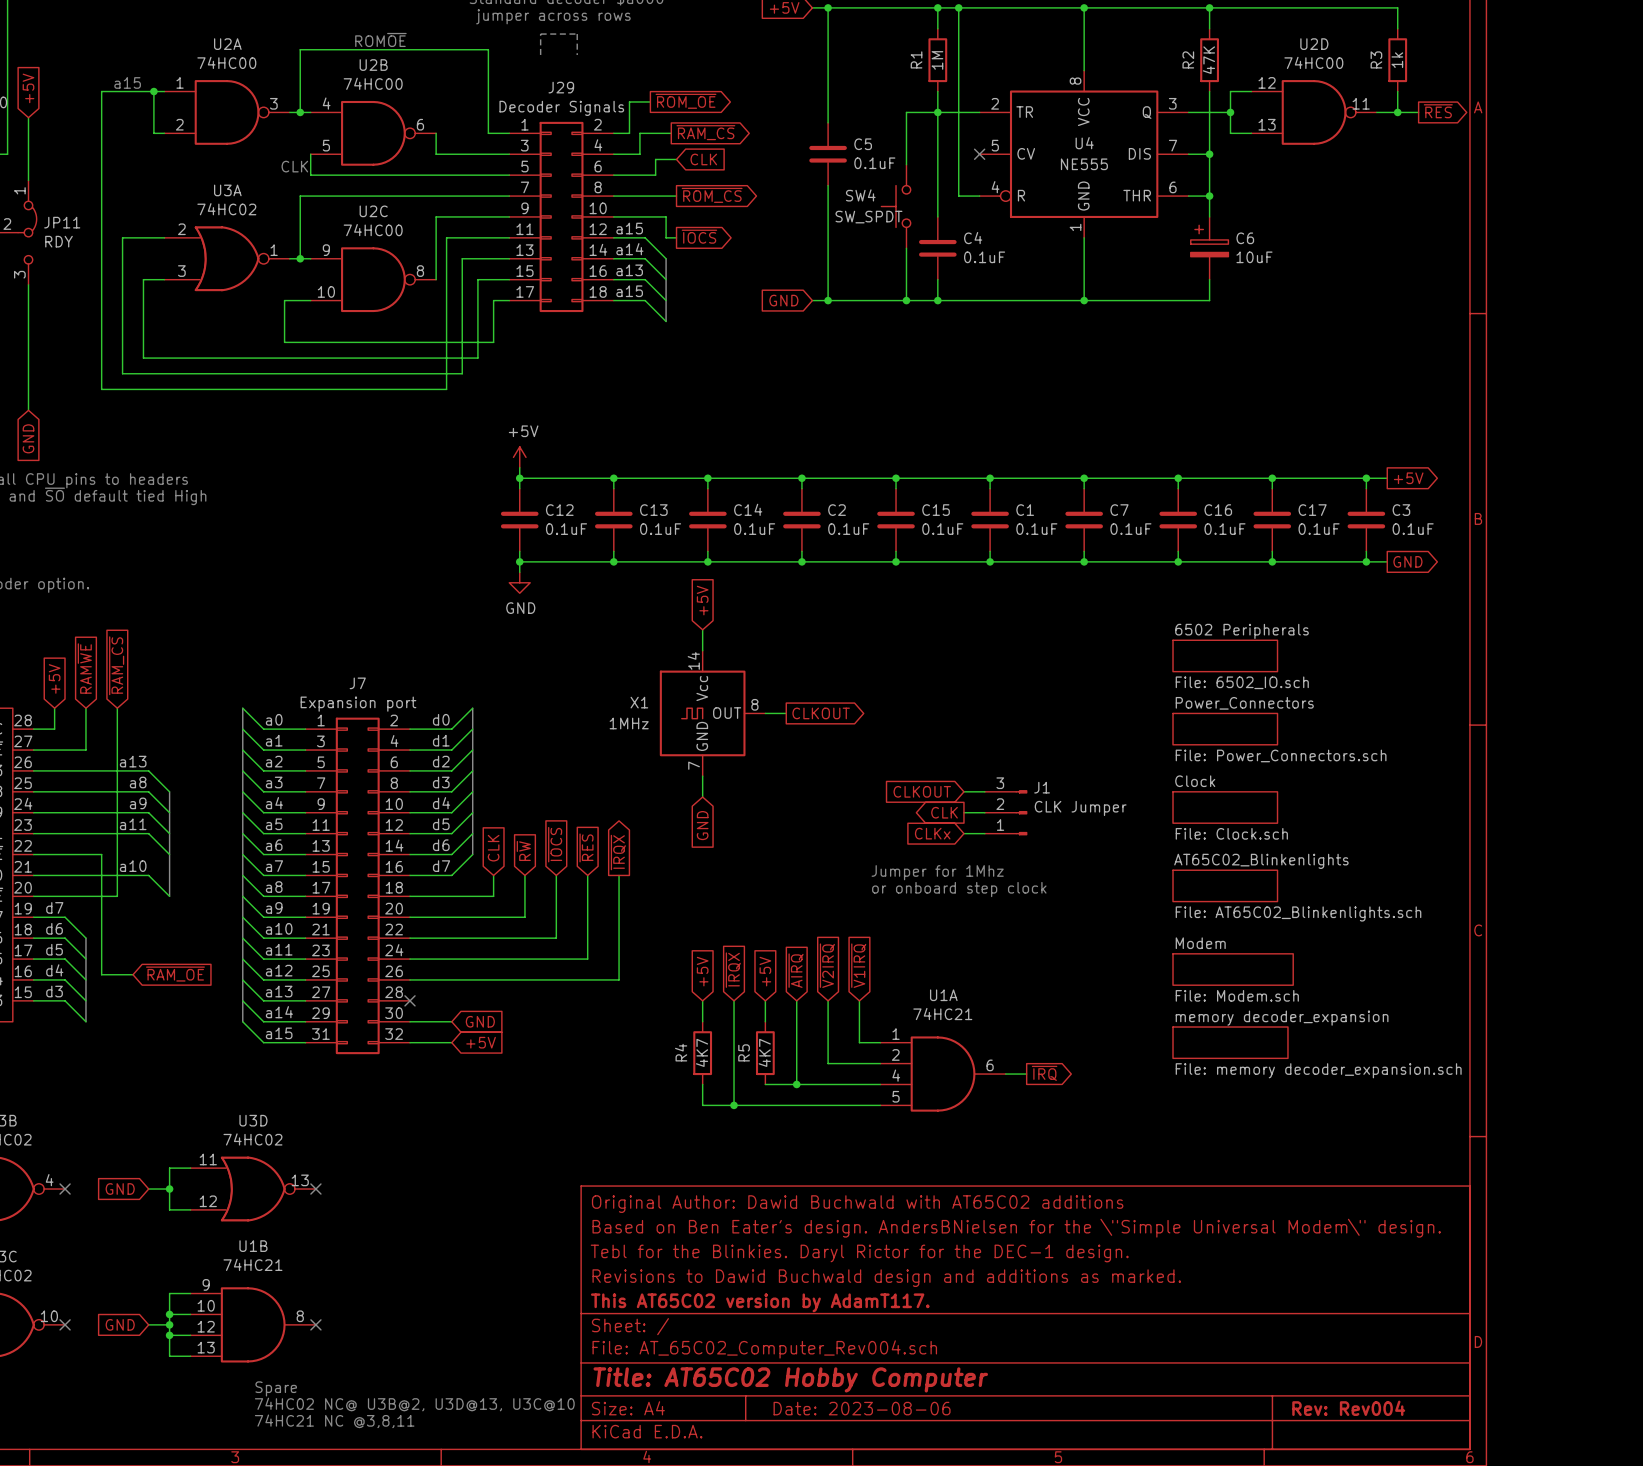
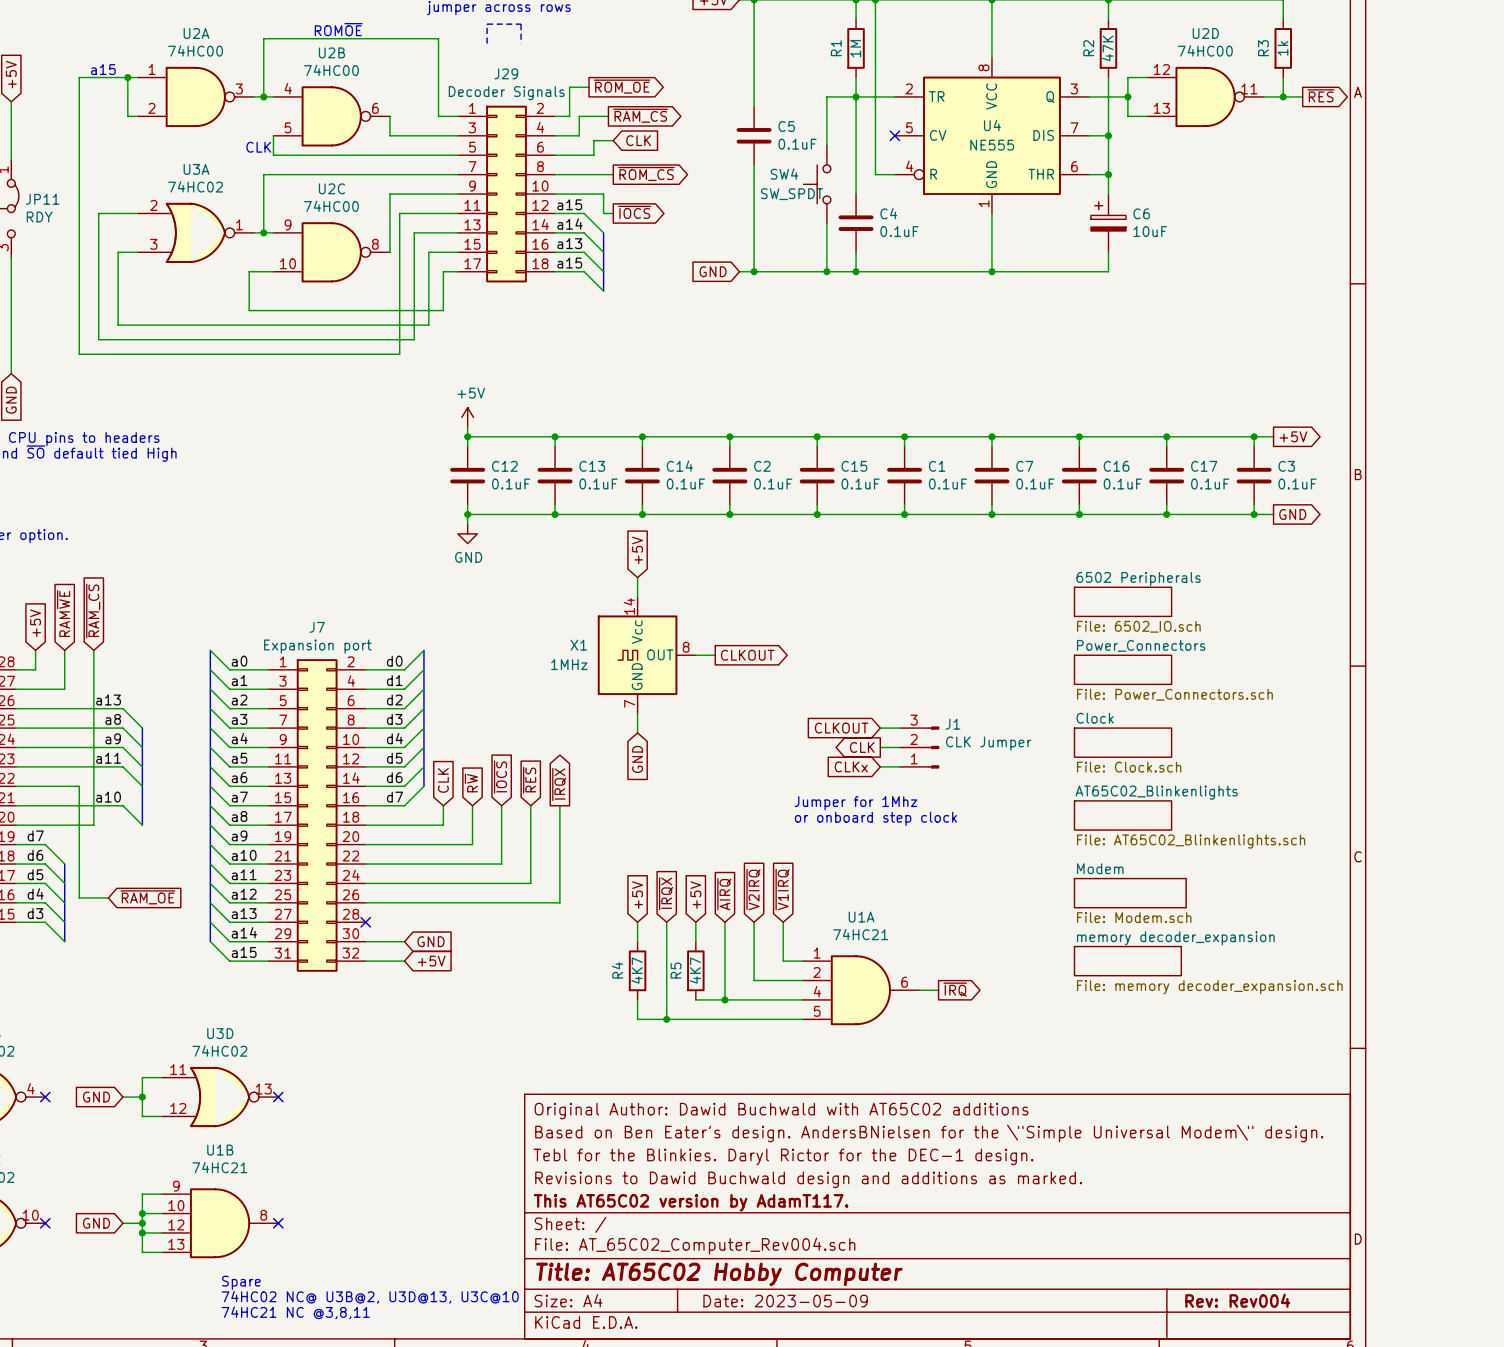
title block: Date: 2023-08-06 (862, 1408) -> Date: 2023-05-09 (785, 1301)

